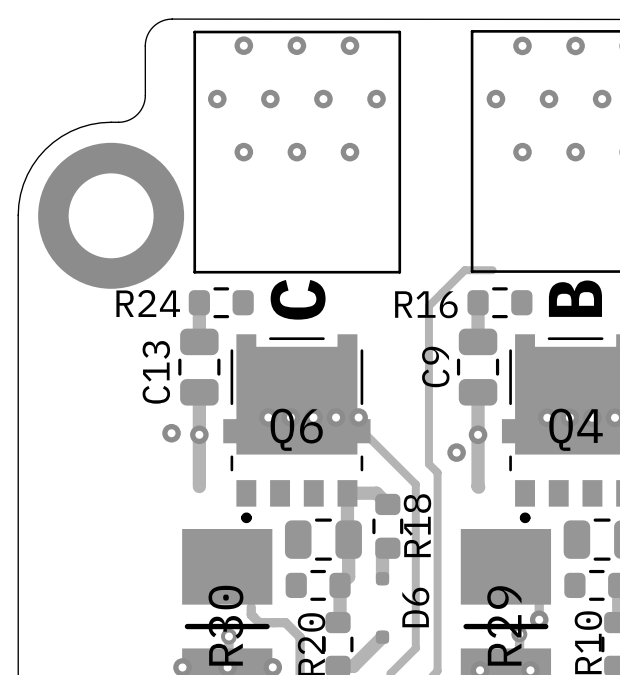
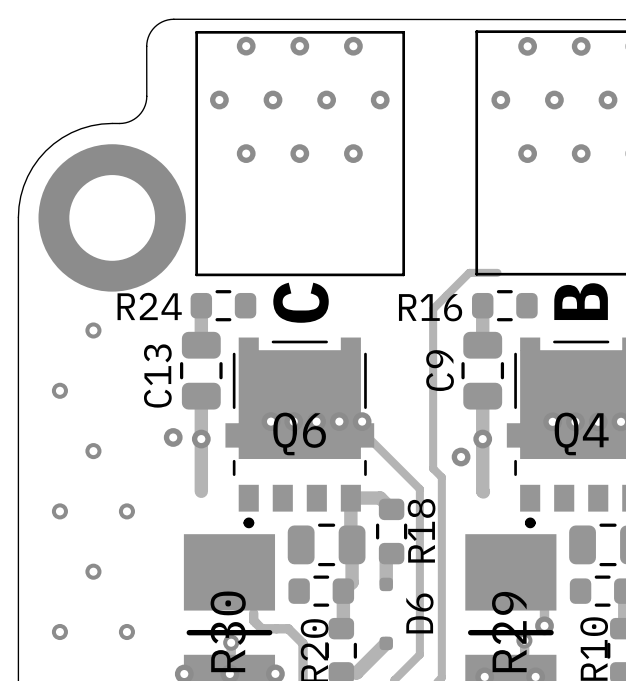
via: none -> (93, 330)
via: none -> (59, 390)
via: none -> (93, 451)
via: none -> (59, 511)
via: none -> (126, 511)
via: none -> (93, 571)
via: none -> (59, 632)
via: none -> (126, 632)

